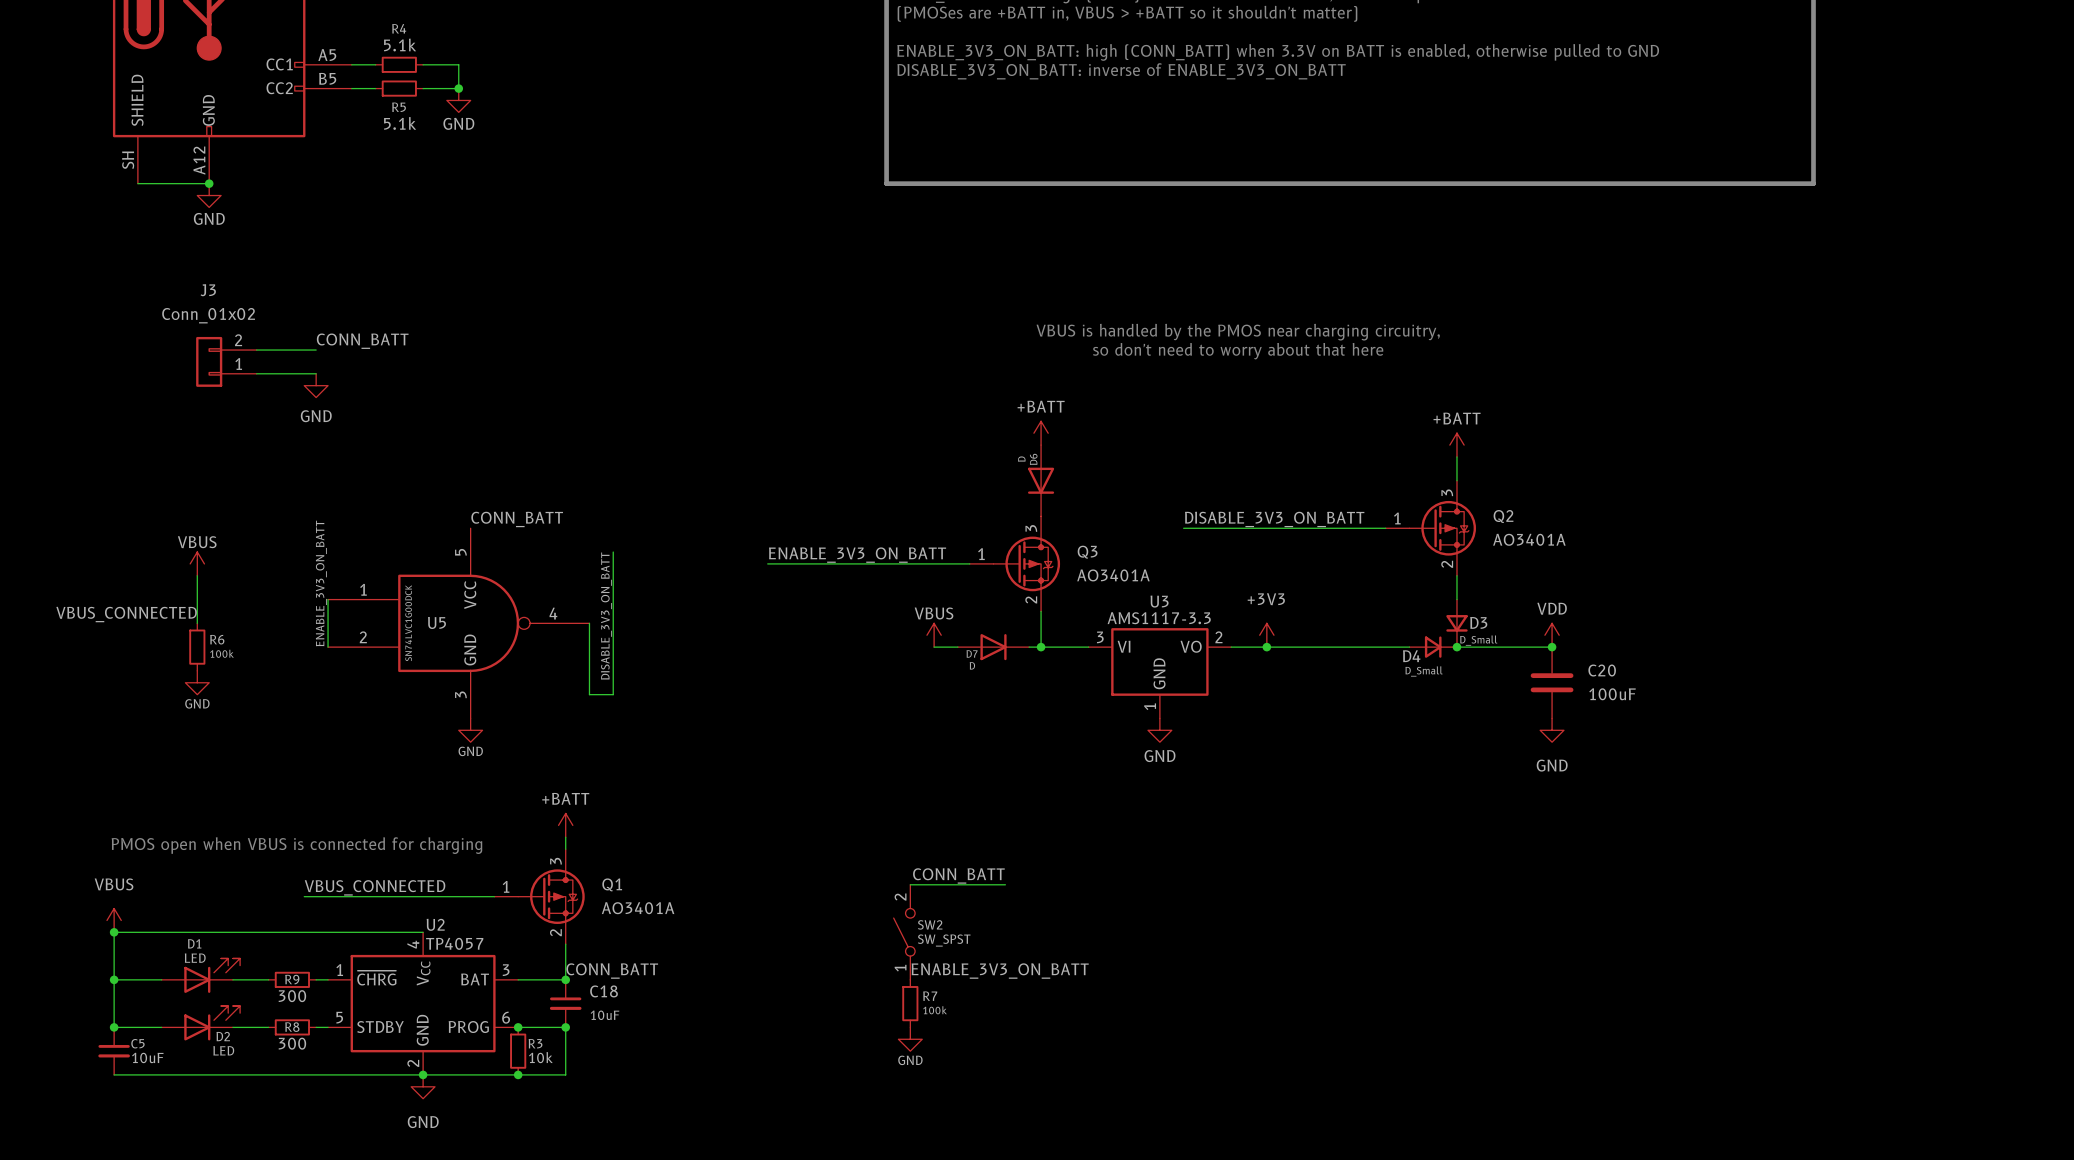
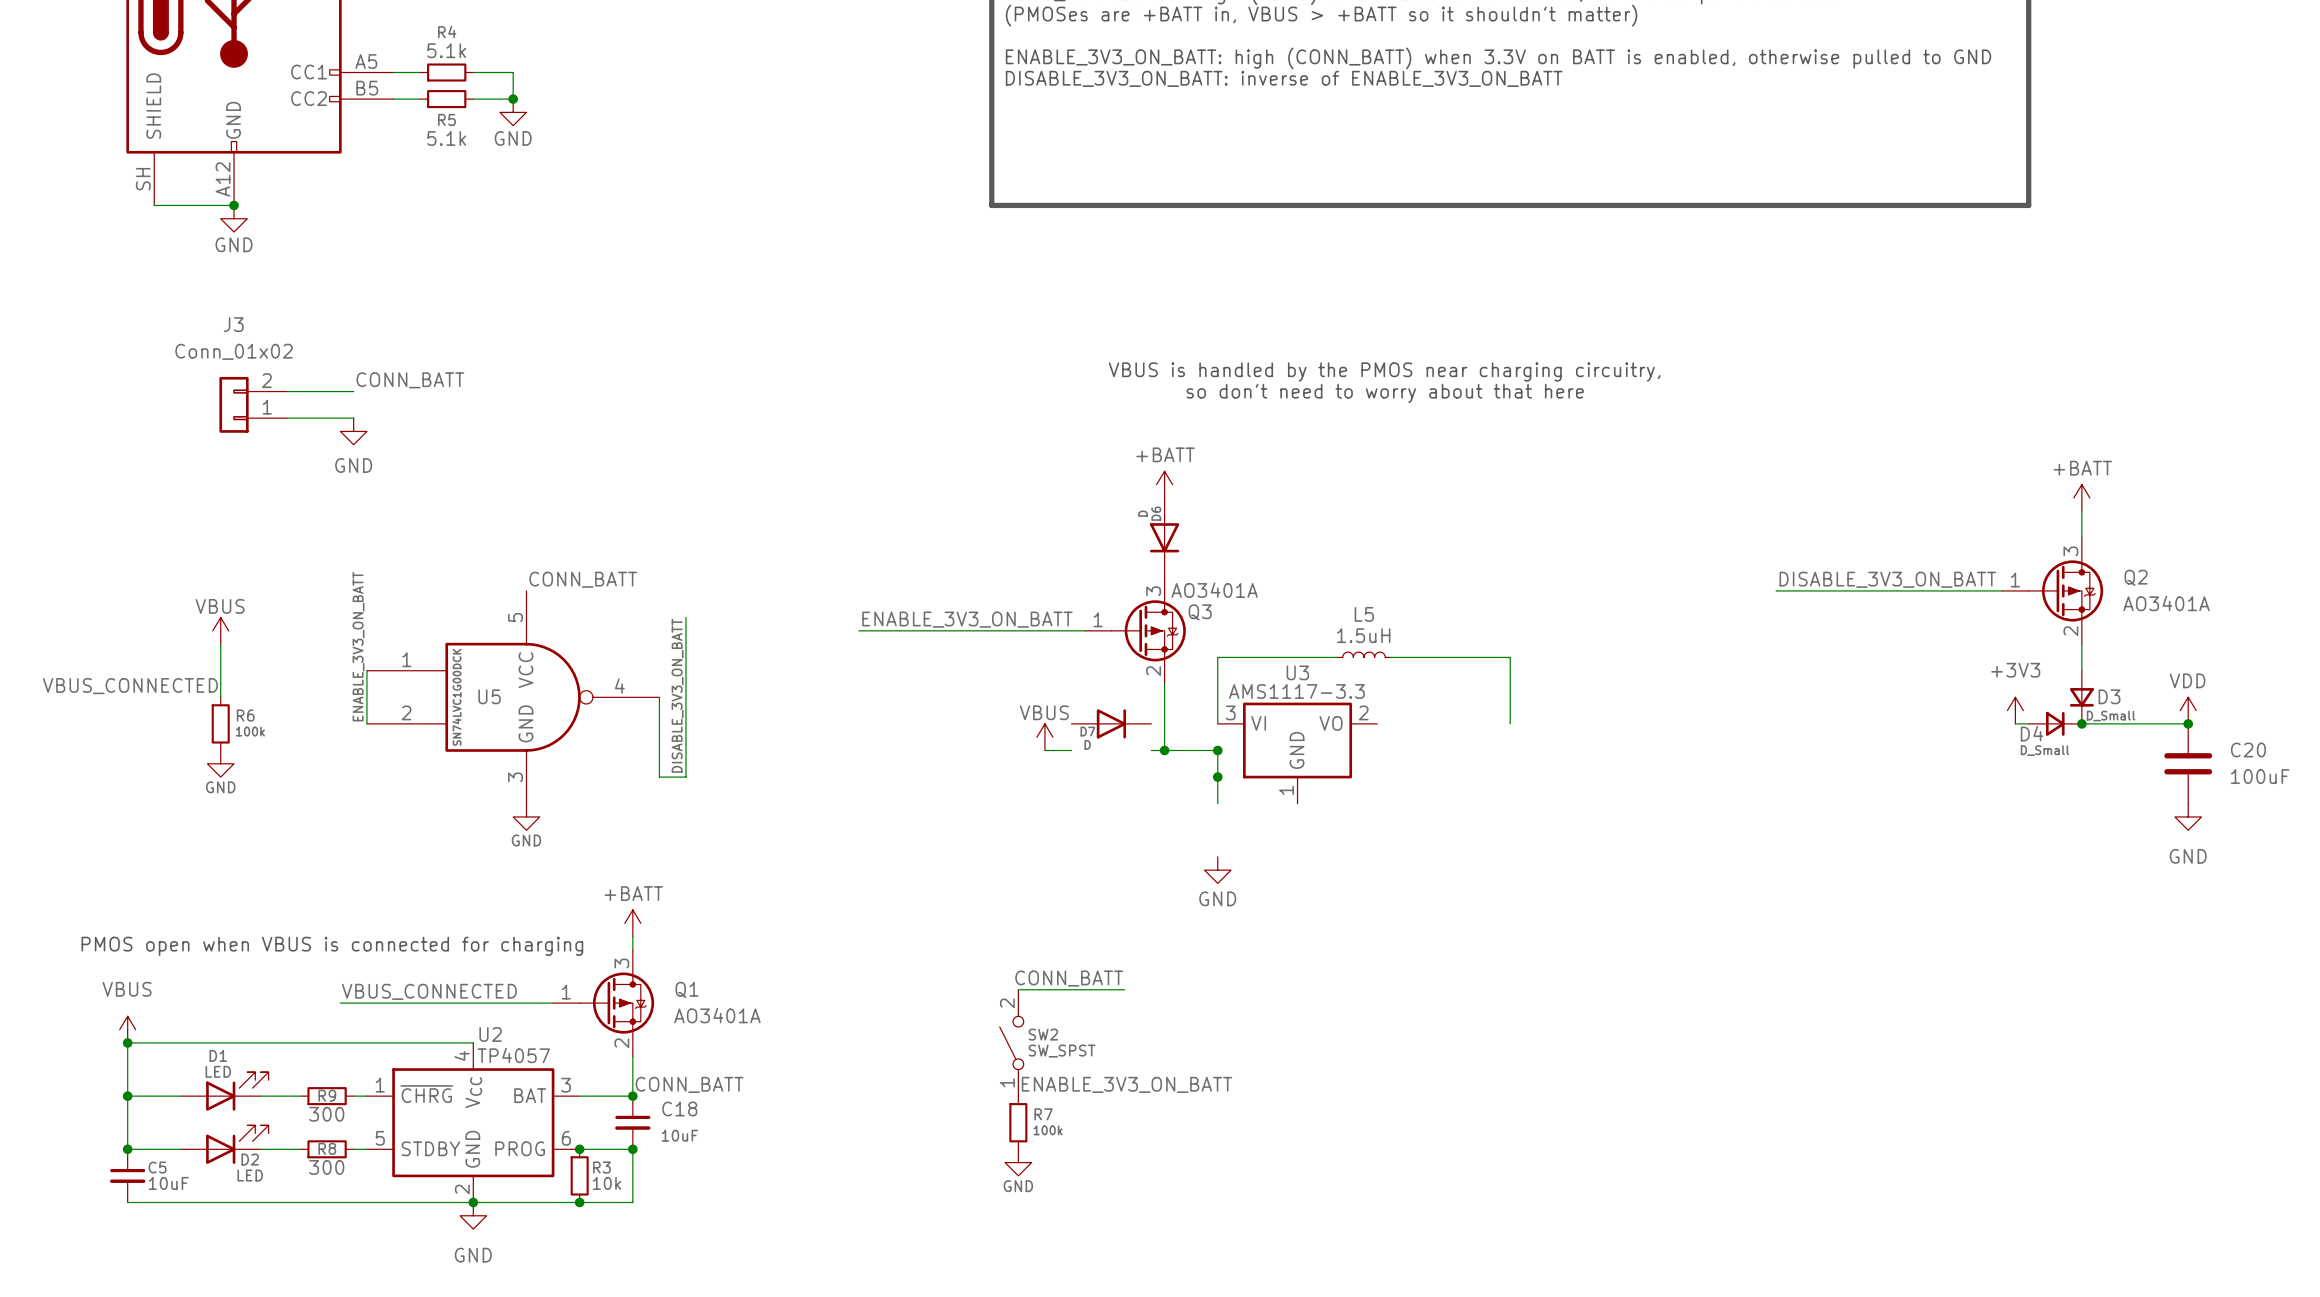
power symbol: +BATT (1456, 445) -> none
power symbol: none -> +BATT (2081, 497)
wire: (1456, 456) (1456, 480) -> none
wire: none -> (2081, 511) (2081, 537)
label: DISABLE_3V3_ON_BATT (1274, 519) -> none
label: none -> DISABLE_3V3_ON_BATT (1887, 579)
wire: (1183, 528) (1385, 528) -> none
Q2 position: (1430, 528) -> (2052, 590)
wire: none -> (1776, 590) (2002, 590)
Q3 name position: Q3 (1087, 552) -> Q3 (1200, 612)
Q3 value position: AO3401A (1113, 575) -> AO3401A (1214, 590)
wire: (1456, 575) (1456, 599) -> none
wire: none -> (2081, 644) (2081, 670)
L5: none -> 1.5uH (1364, 654)
wire: none -> (1390, 657) (1510, 657) (1510, 723)
D3 position: (1456, 623) -> (2081, 697)
power symbol position: VBUS (934, 635) -> VBUS (1044, 737)
power symbol: +3V3 (1266, 635) -> none
power symbol: VDD (1552, 635) -> none
power symbol: none -> +3V3 (2015, 710)
power symbol: none -> VDD (2188, 710)
wire: (934, 647) (957, 647) -> (1044, 750) (1071, 750)
wire: (1029, 647) (1088, 647) -> (1337, 657) (1217, 657) (1217, 723)
wire: none -> (1164, 723) (1164, 750)
junction position: (1041, 647) -> (1164, 750)
wire: (1231, 647) (1409, 647) -> none
junction: (1266, 647) -> none
D4 position: (1433, 647) -> (2055, 723)
wire: (1456, 647) (1552, 647) -> none
junction: (1456, 647) -> none
junction: (1552, 647) -> none
wire: none -> (2015, 723) (2028, 723)
wire: none -> (2081, 723) (2188, 723)
junction: none -> (2081, 723)
junction: none -> (2188, 723)
wire: none -> (1151, 750) (1217, 750) (1217, 803)
junction: none -> (1217, 750)
C20 position: (1552, 682) -> (2188, 763)
junction: none -> (1217, 777)
power symbol position: GND (1159, 730) -> GND (1217, 870)
power symbol: GND (1552, 730) -> none
power symbol: none -> GND (2188, 816)

